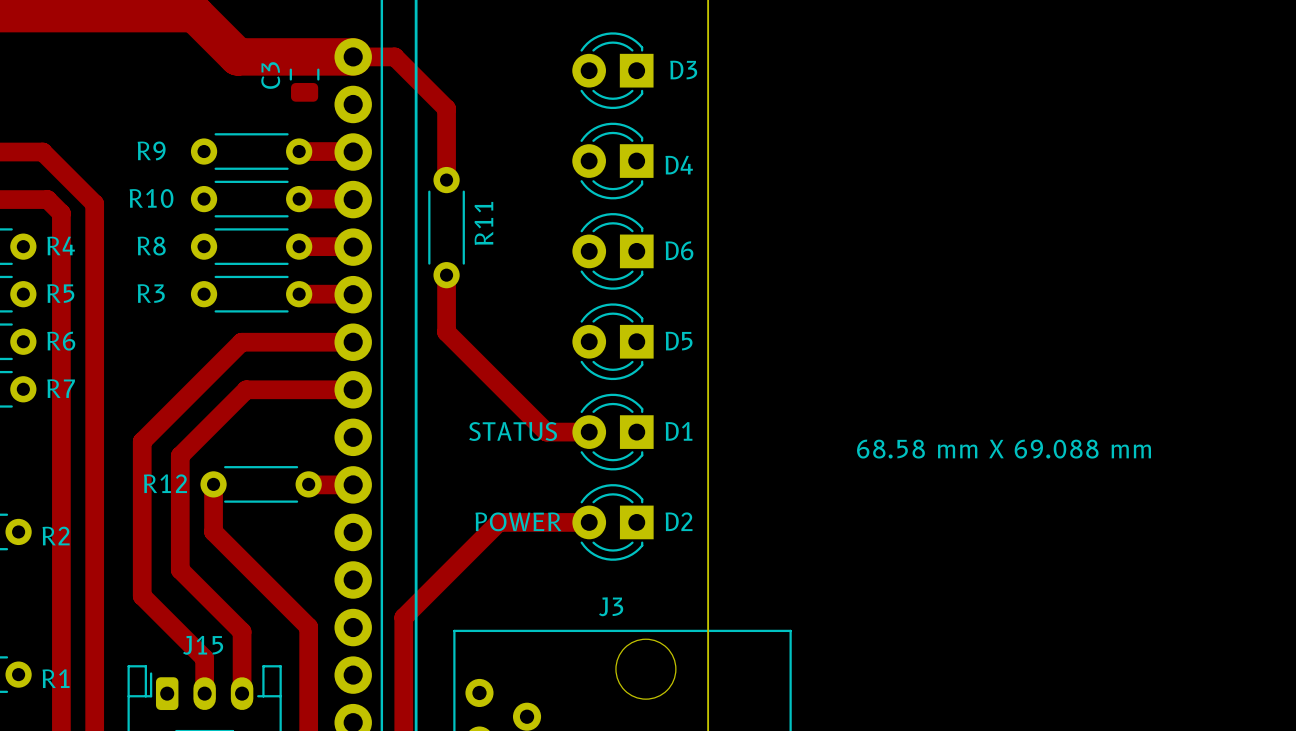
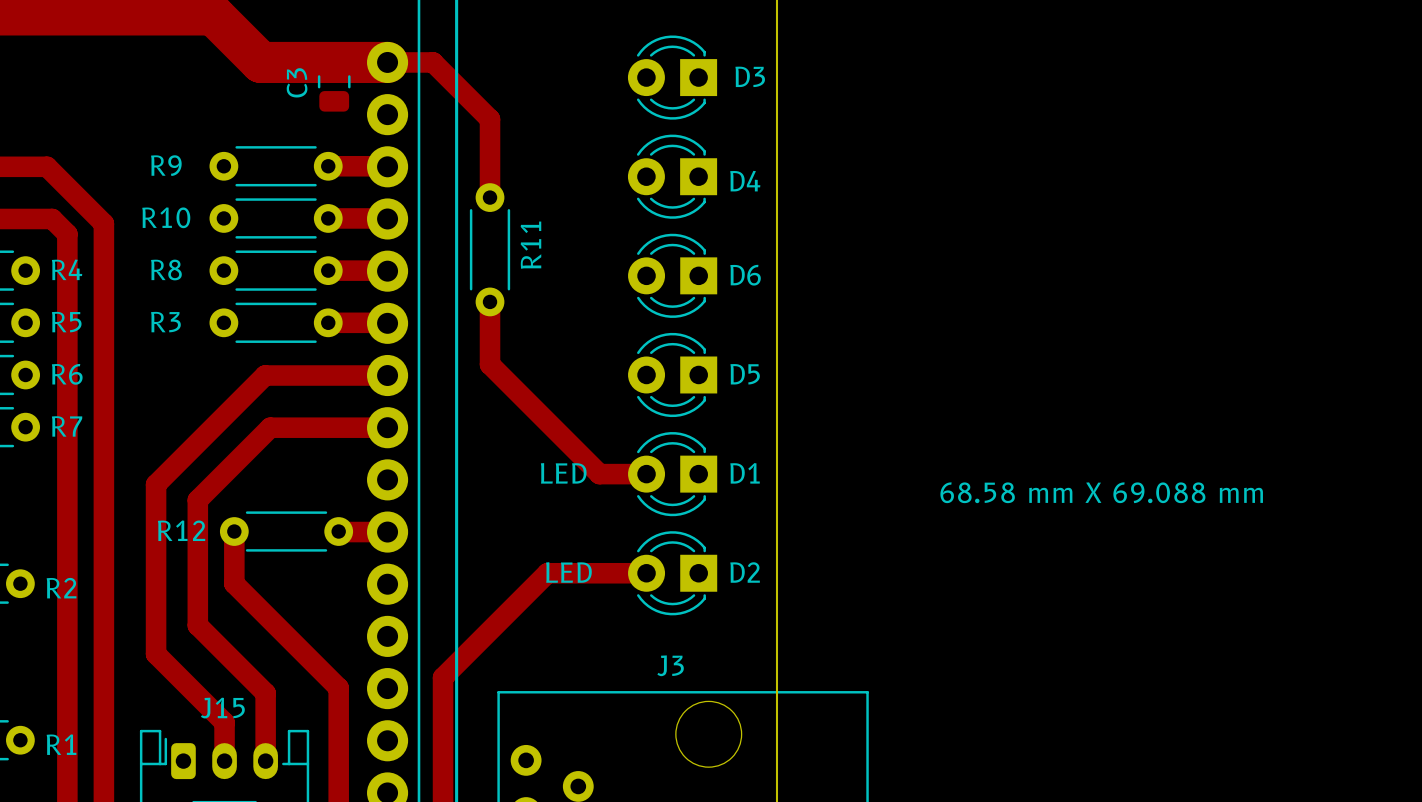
D1 value: STATUS (513, 431) -> LED (563, 473)
D2 value: POWER (518, 521) -> LED (568, 572)

